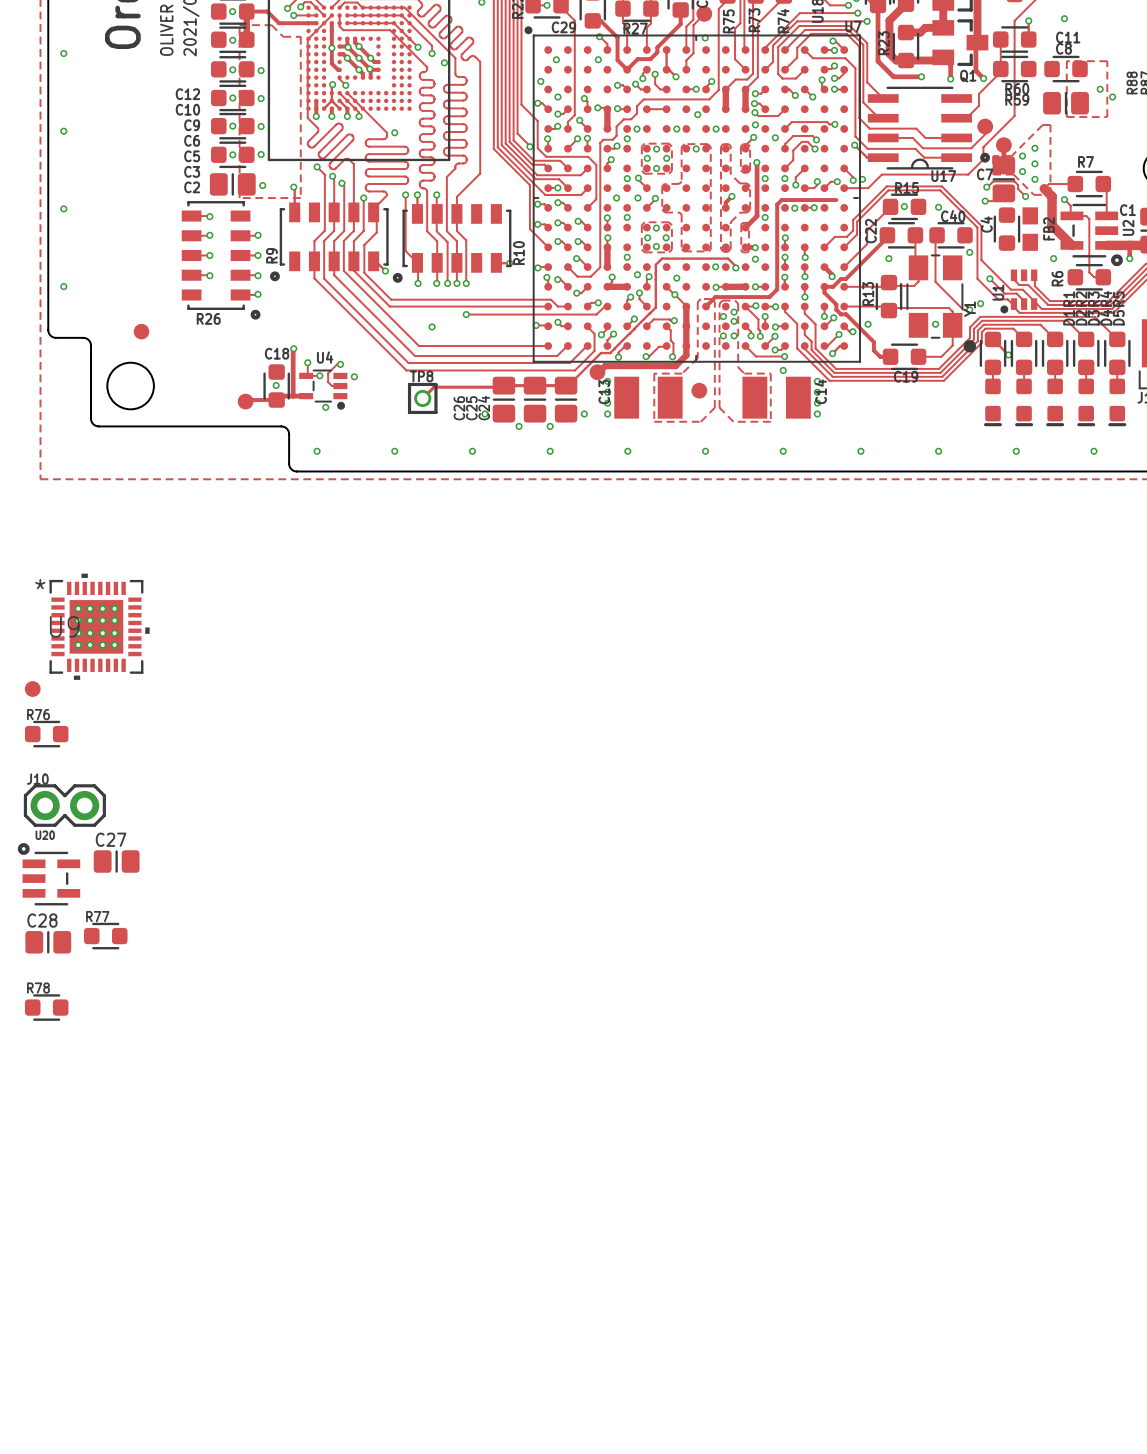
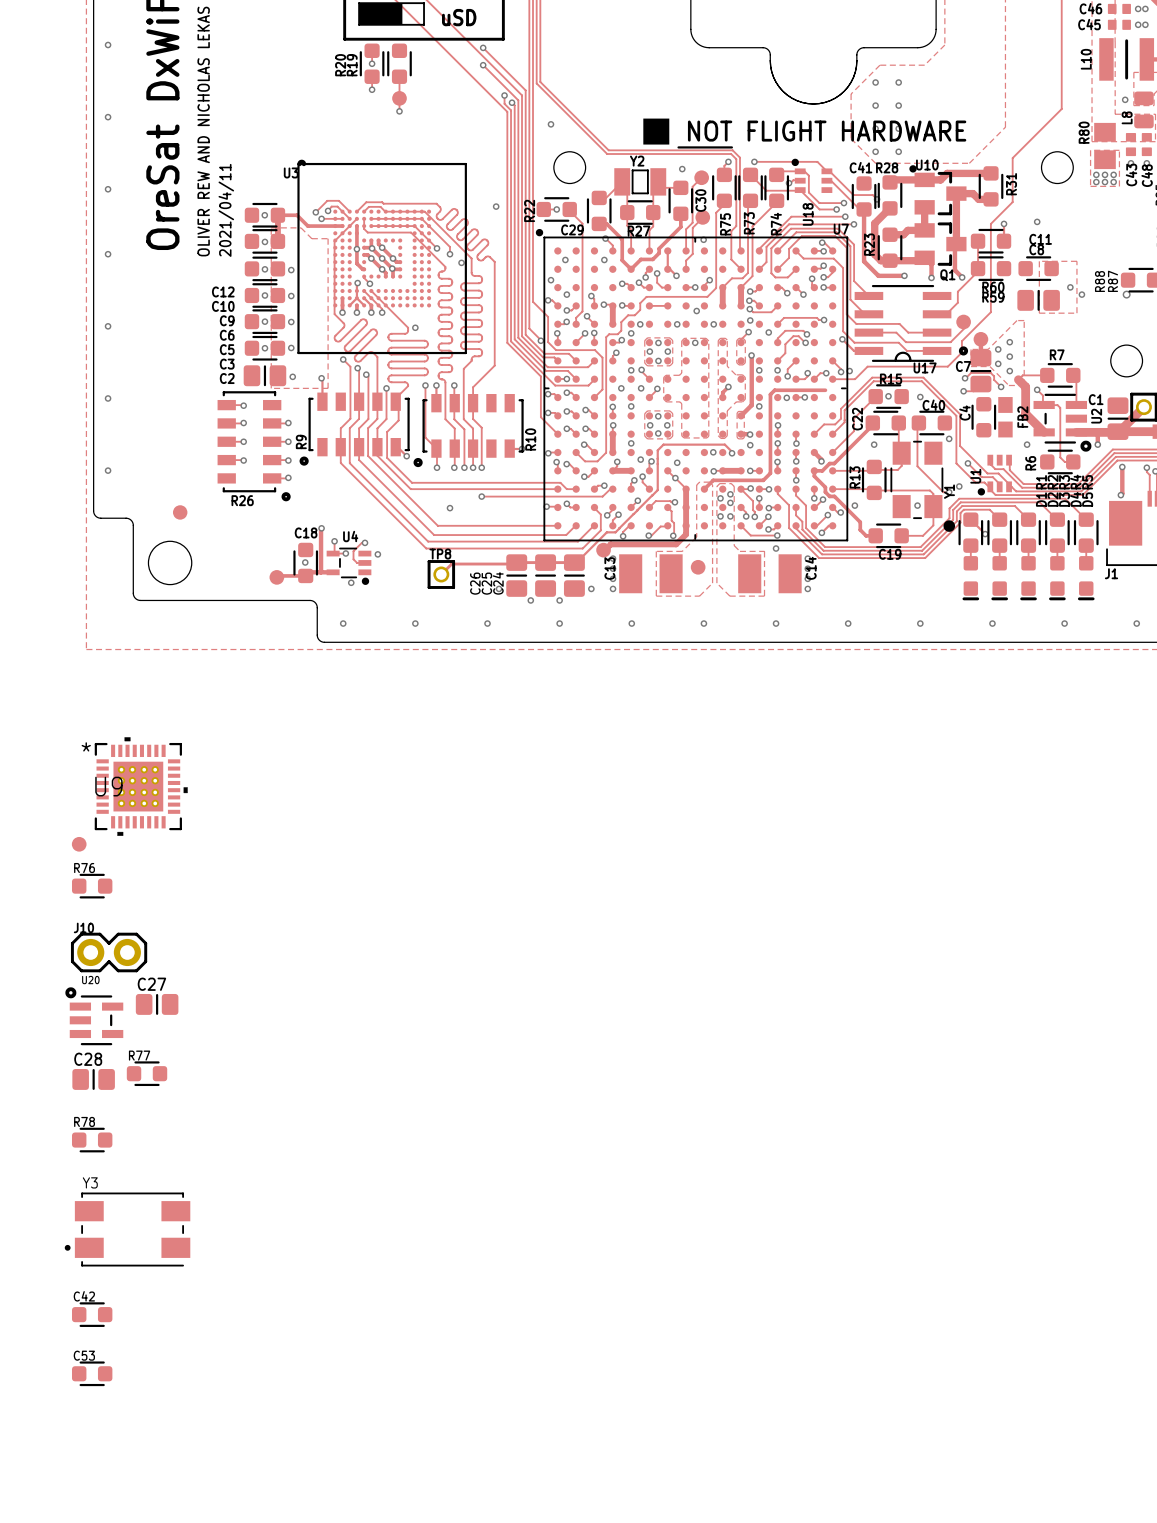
Y3: none -> (127, 1229)
C42: none -> (92, 1314)
C53: none -> (92, 1373)

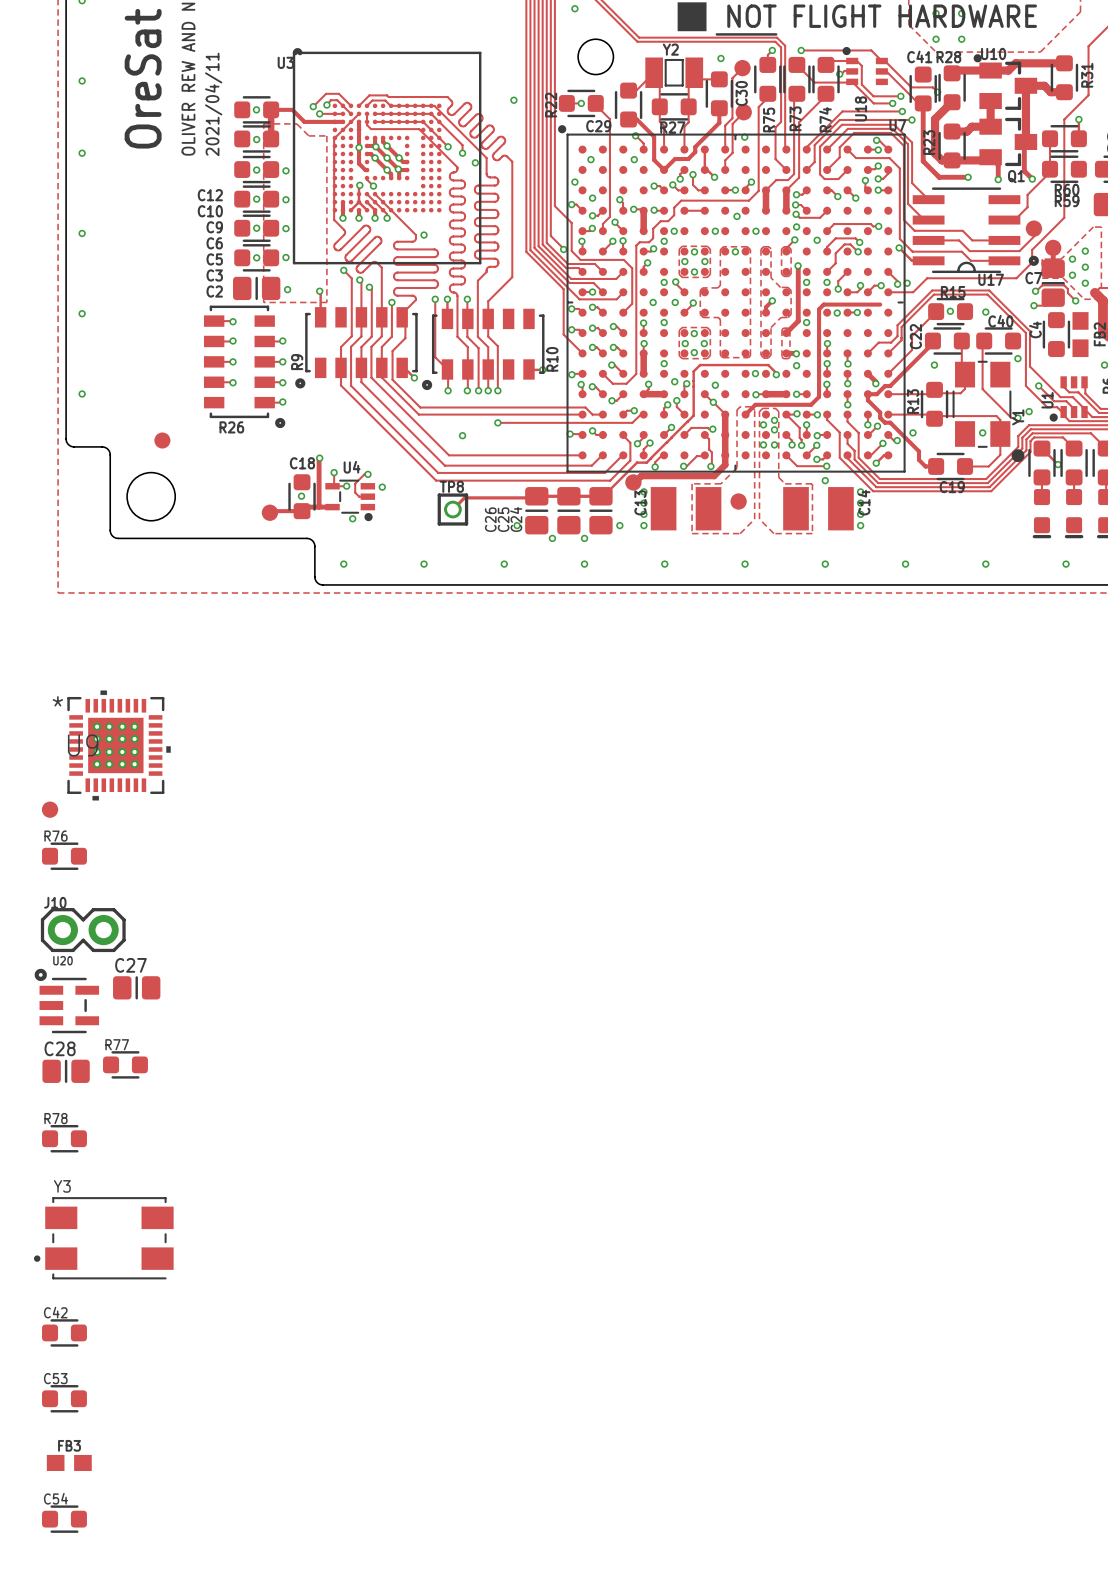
FB3: none -> (69, 1462)
C54: none -> (64, 1519)

